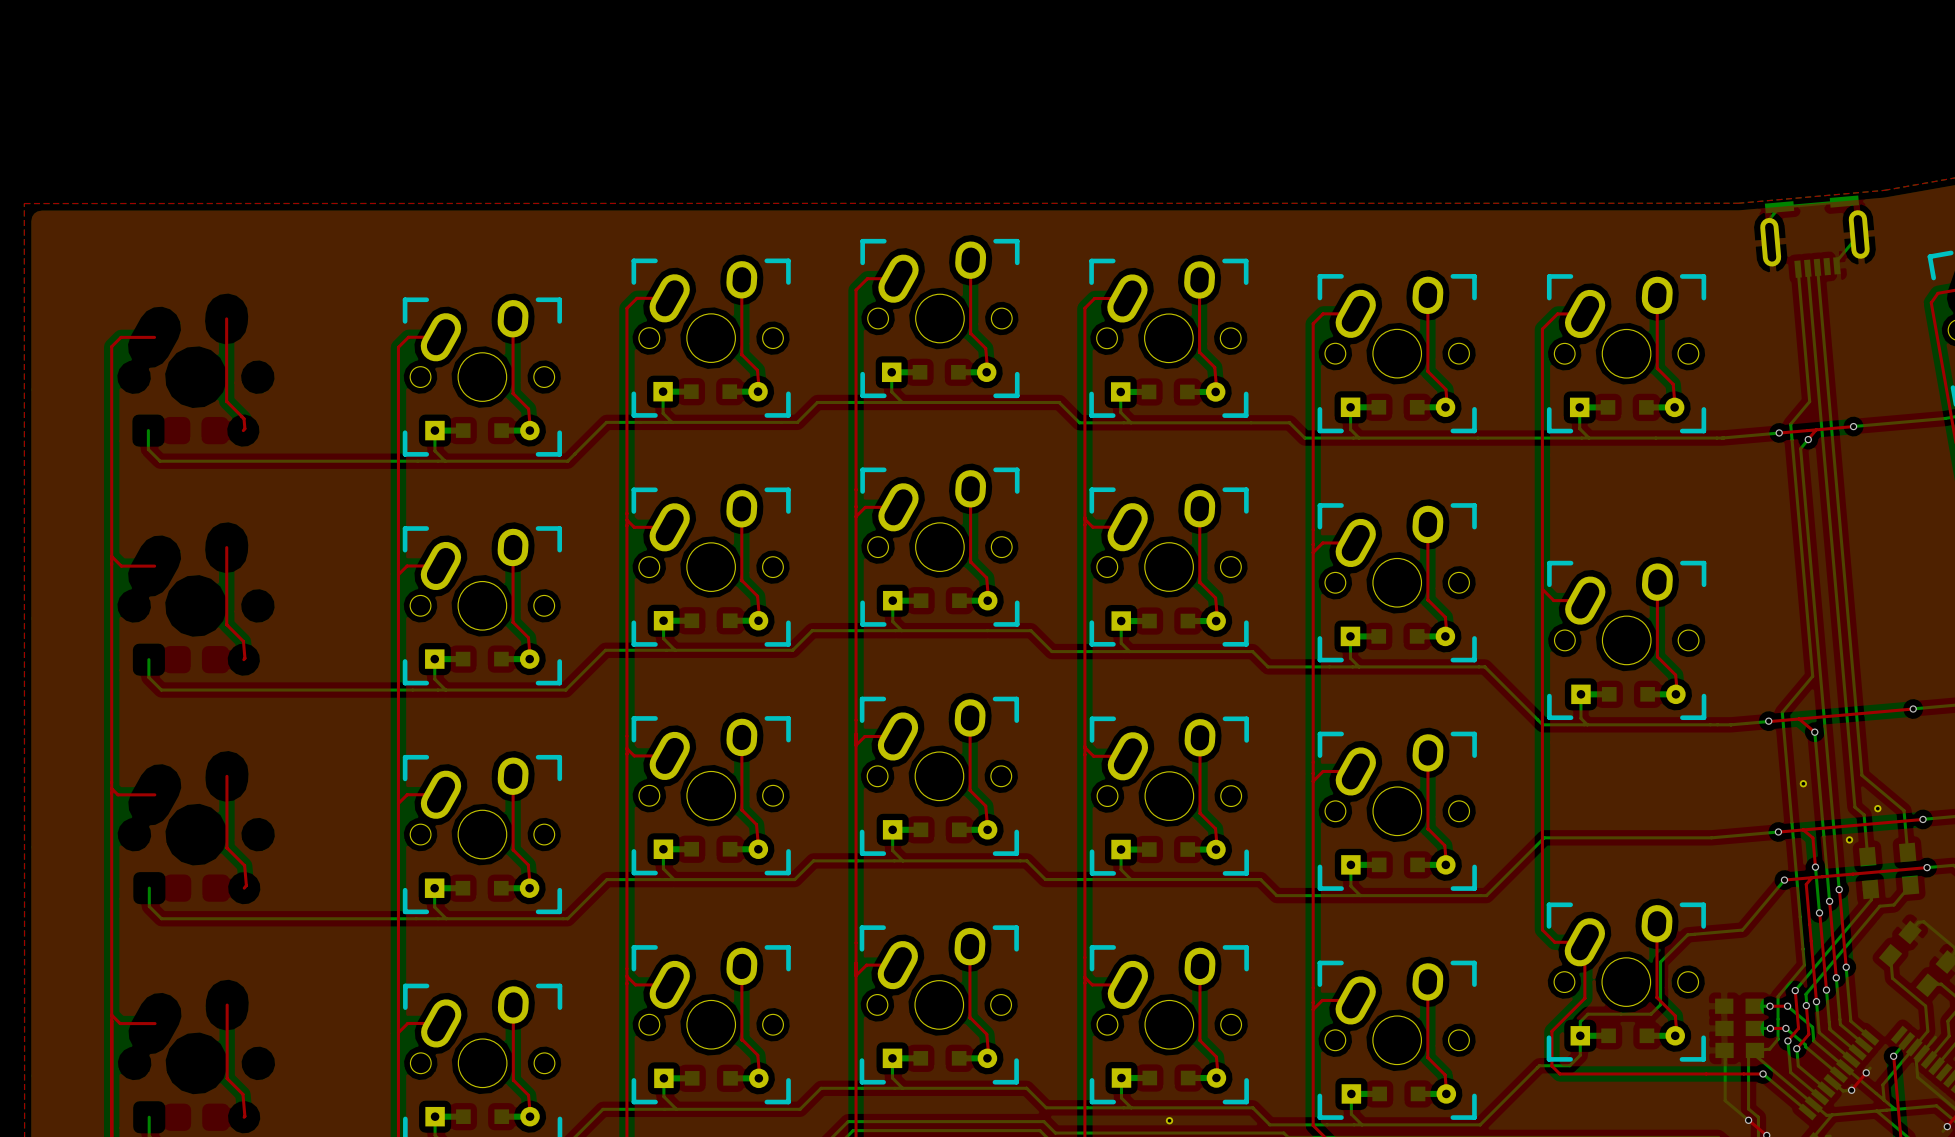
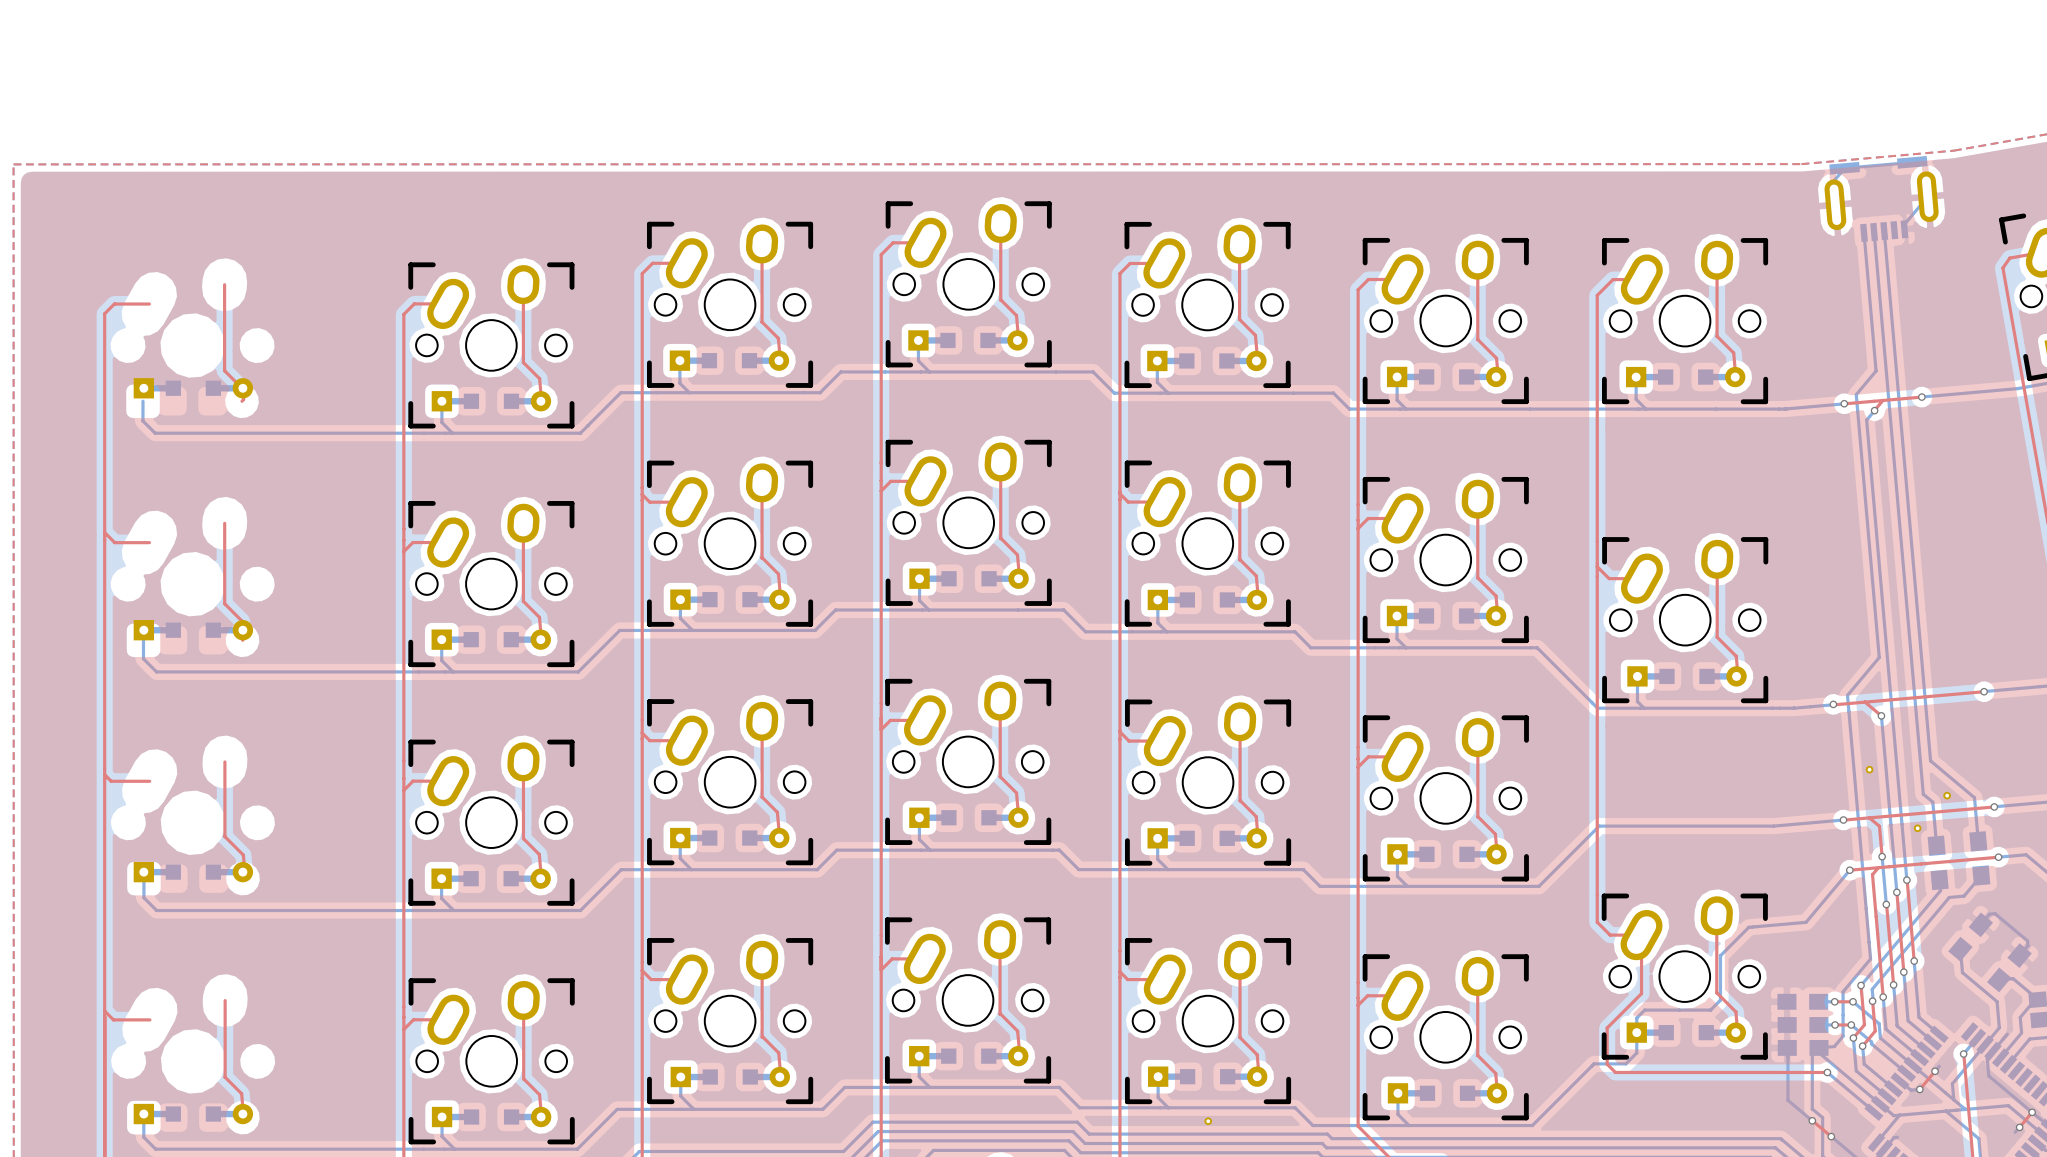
part: none -> (193, 388)
part: none -> (193, 630)
part: none -> (193, 872)
part: none -> (193, 1114)

